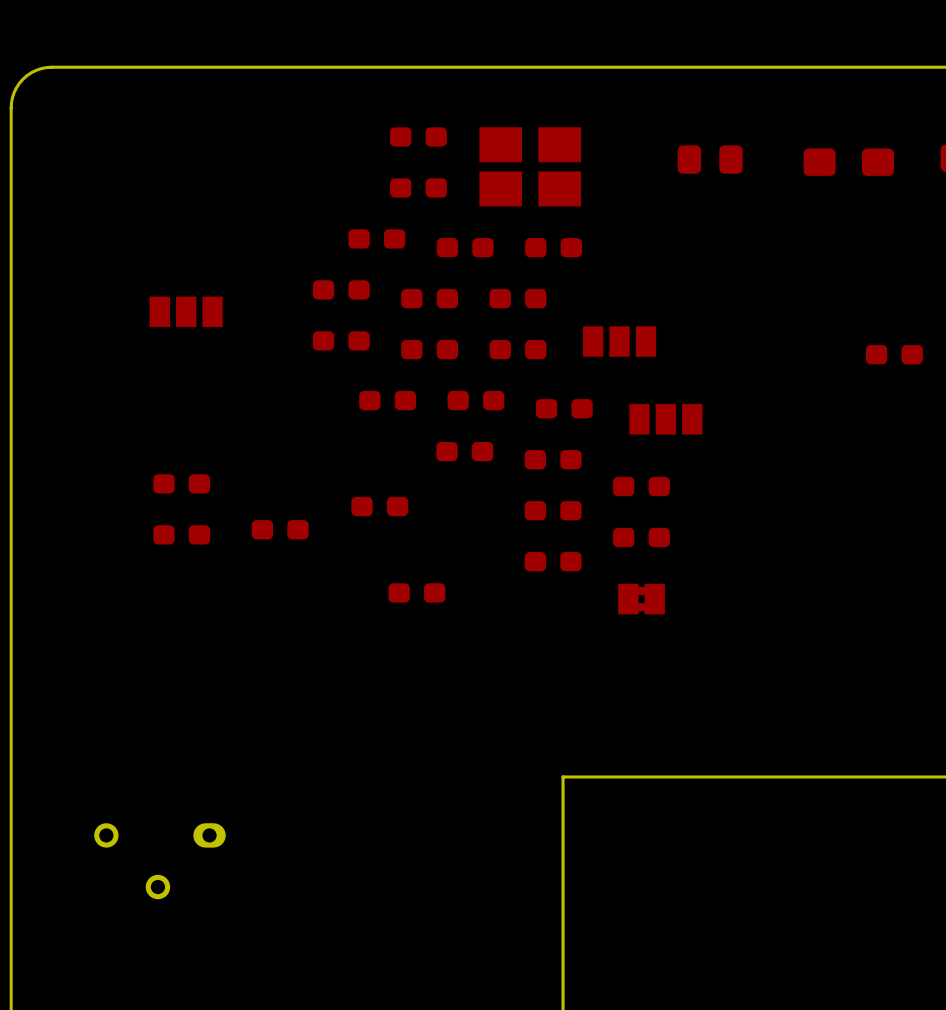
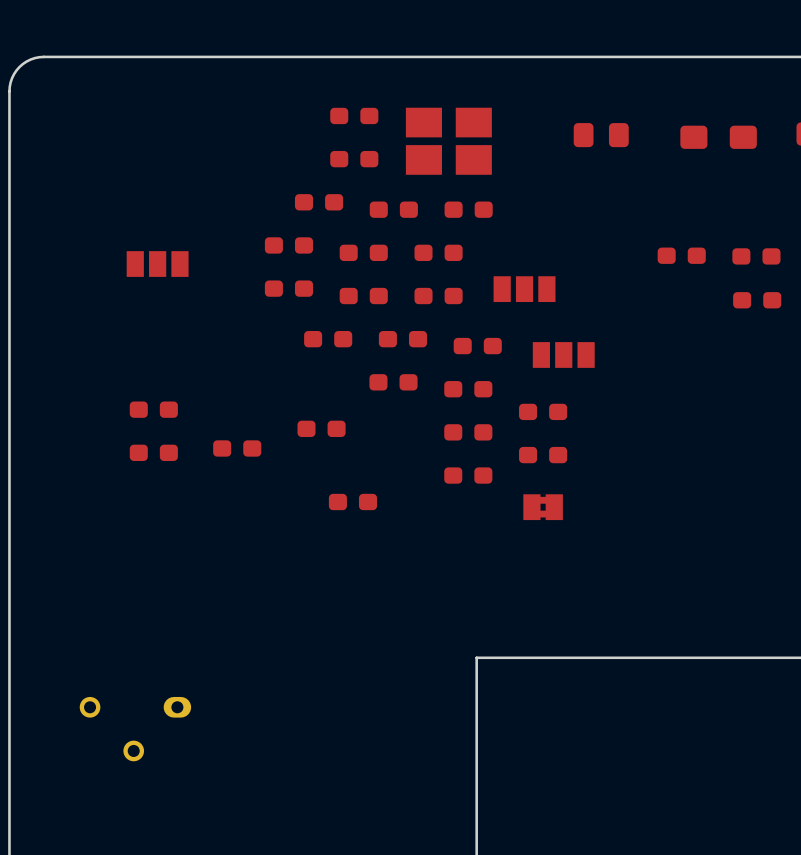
part: none -> (681, 255)
part: none -> (756, 256)

